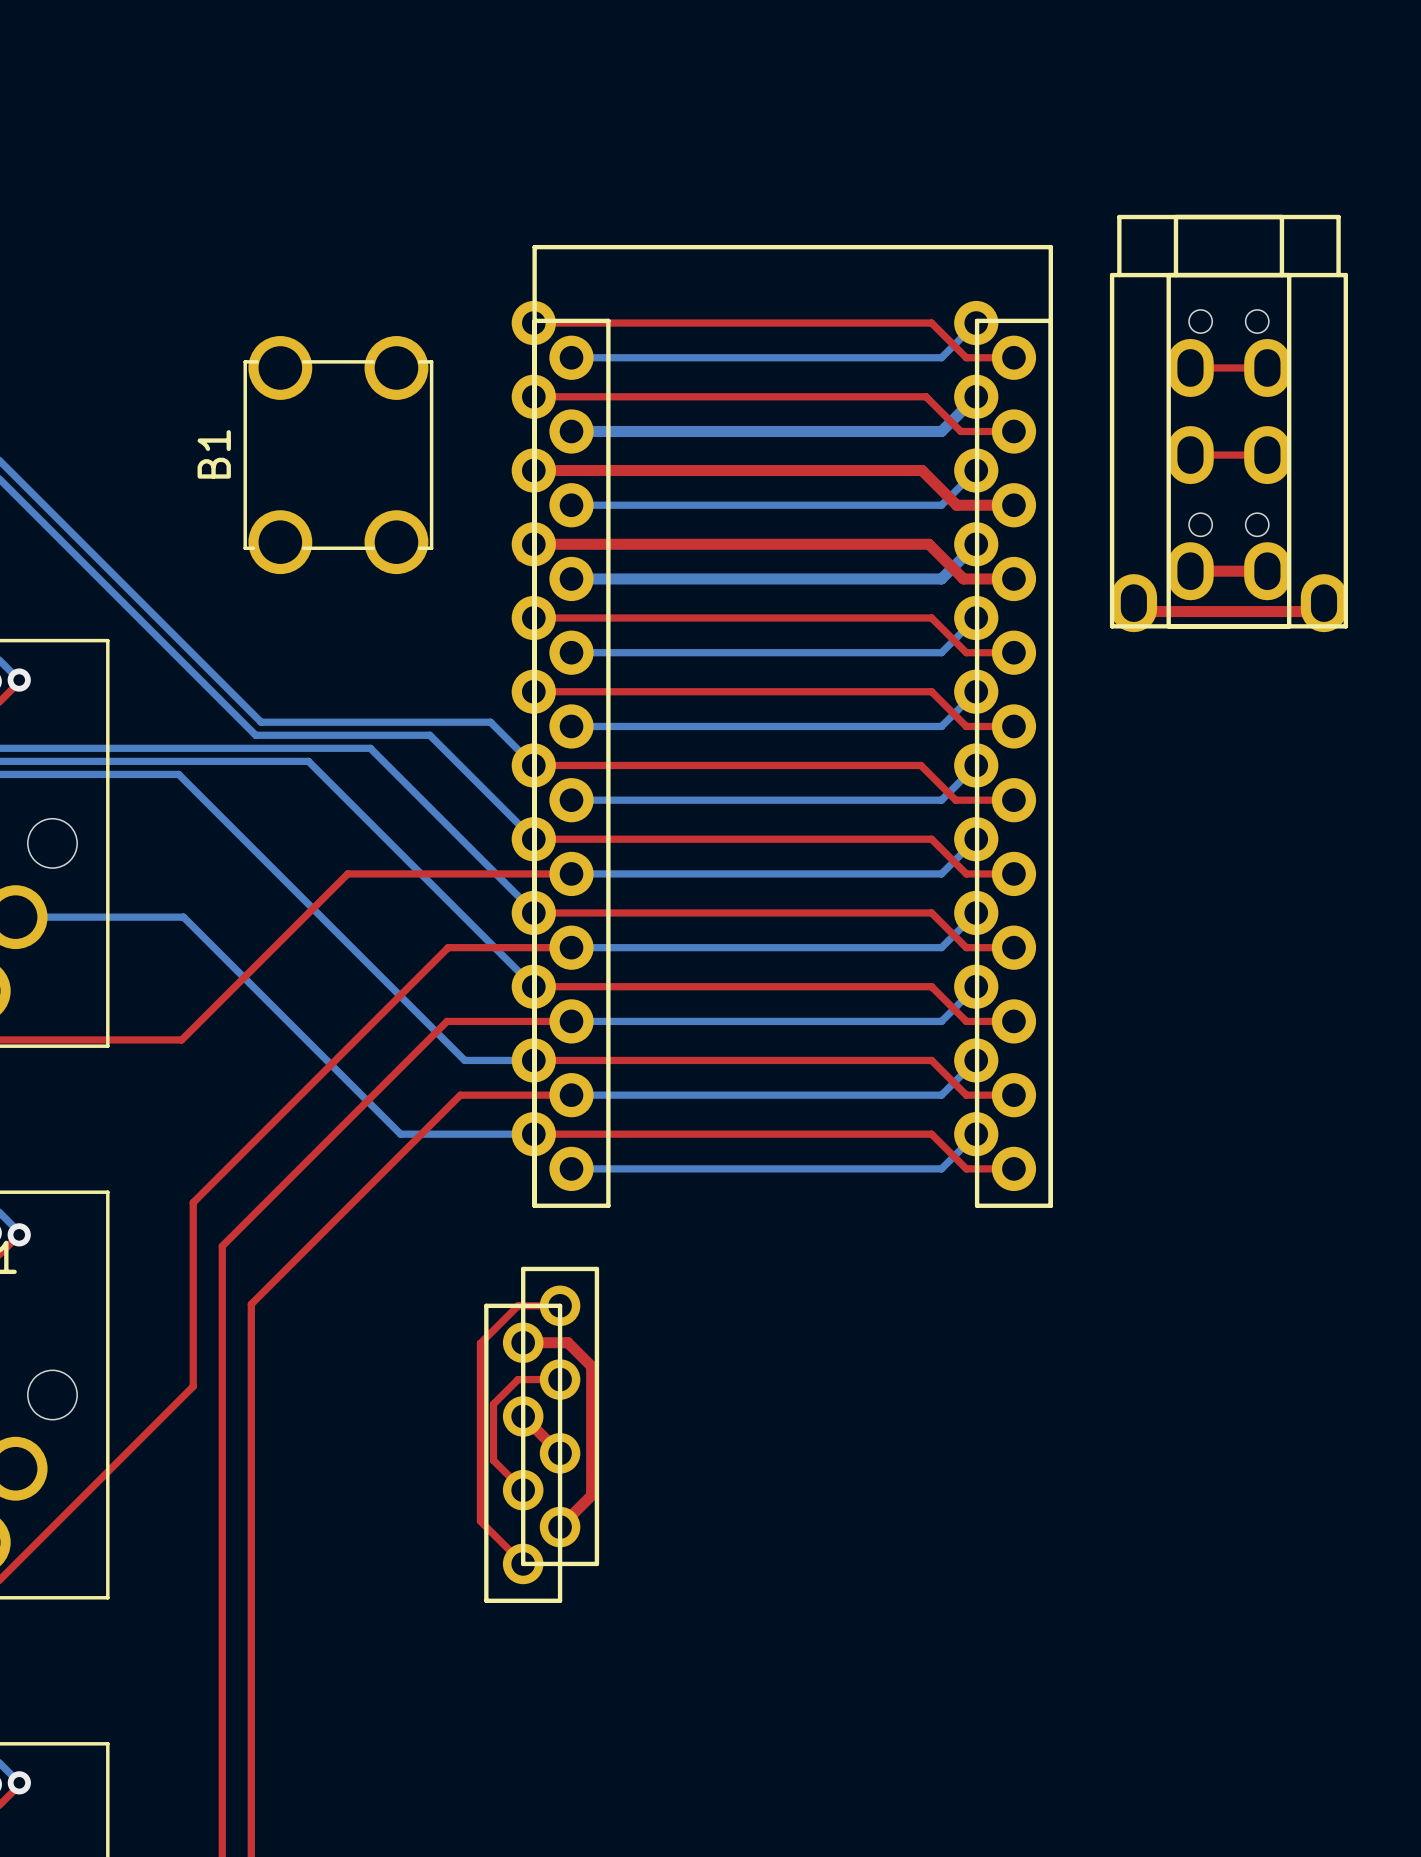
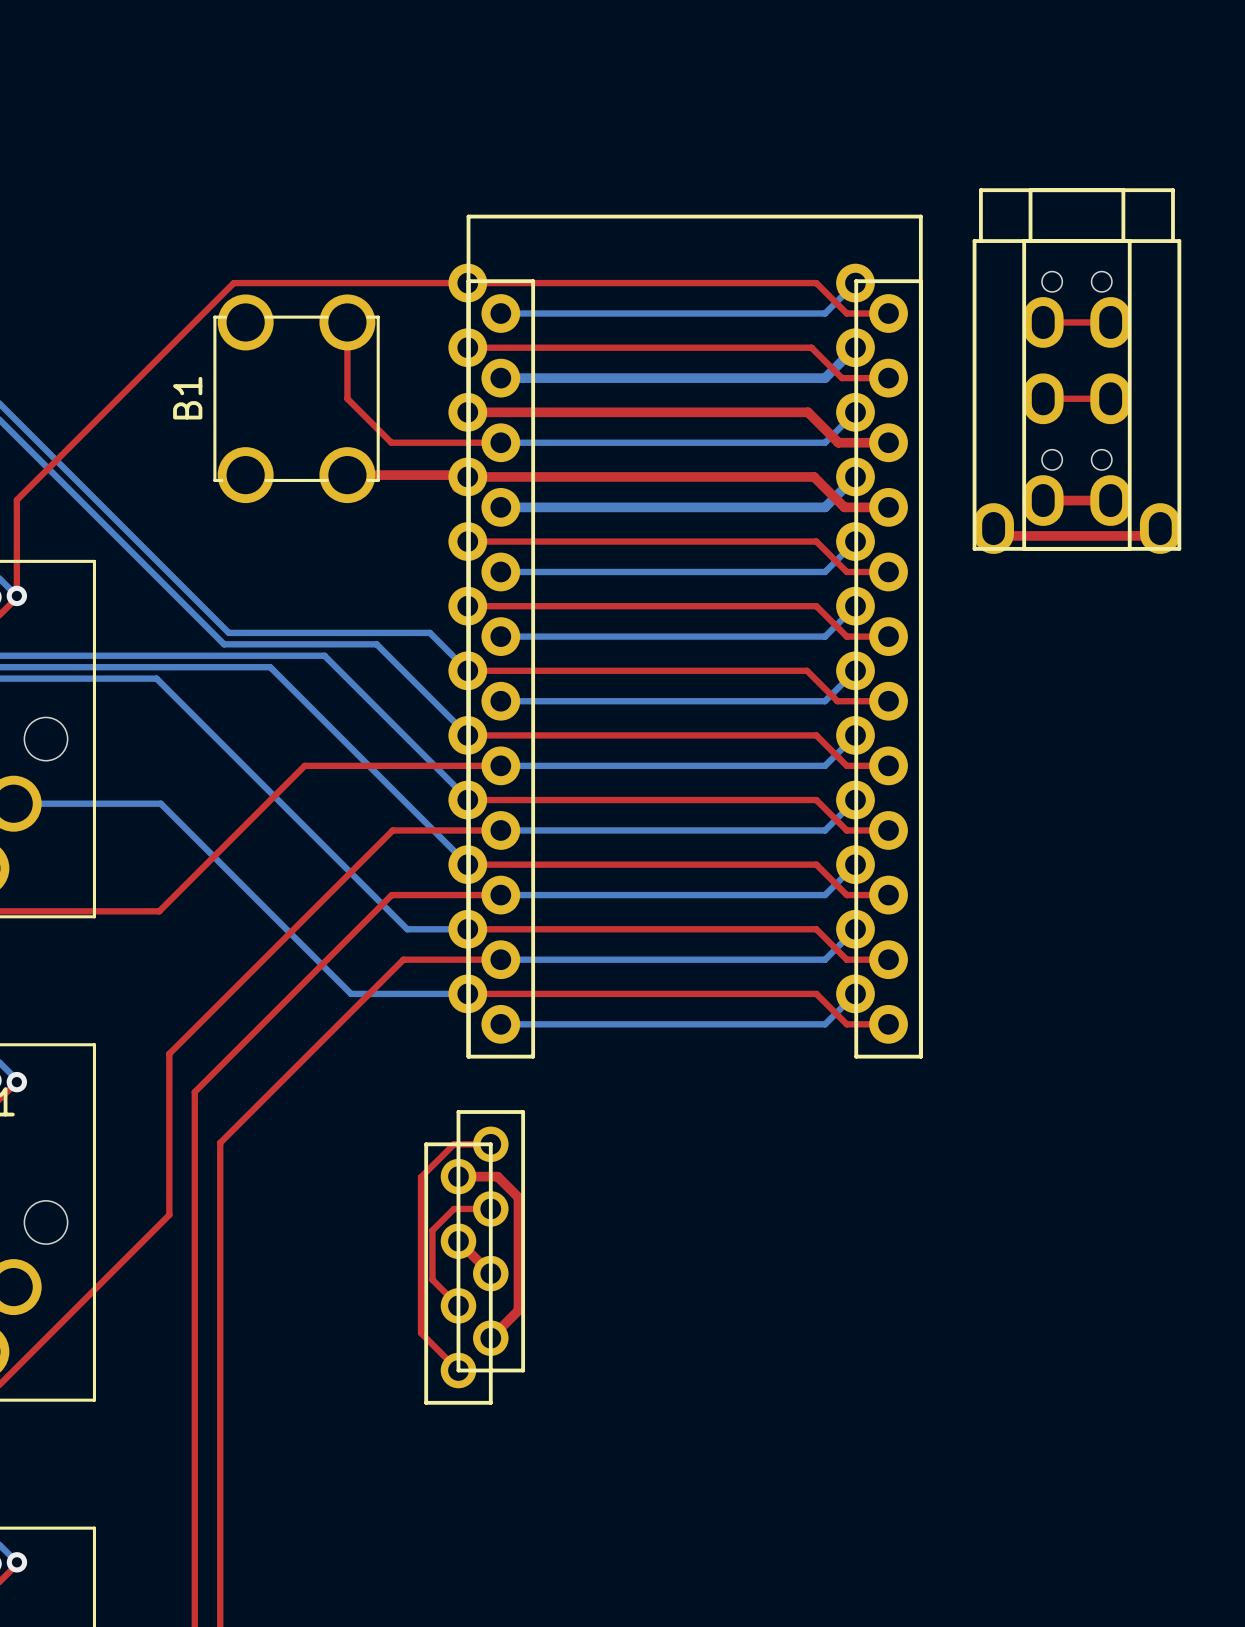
top track: none -> (467, 283) (233, 283) (16, 500) (16, 595)
top track: none -> (347, 322) (347, 398) (391, 442) (500, 442)
top track: none -> (347, 475) (465, 475) (467, 476)

